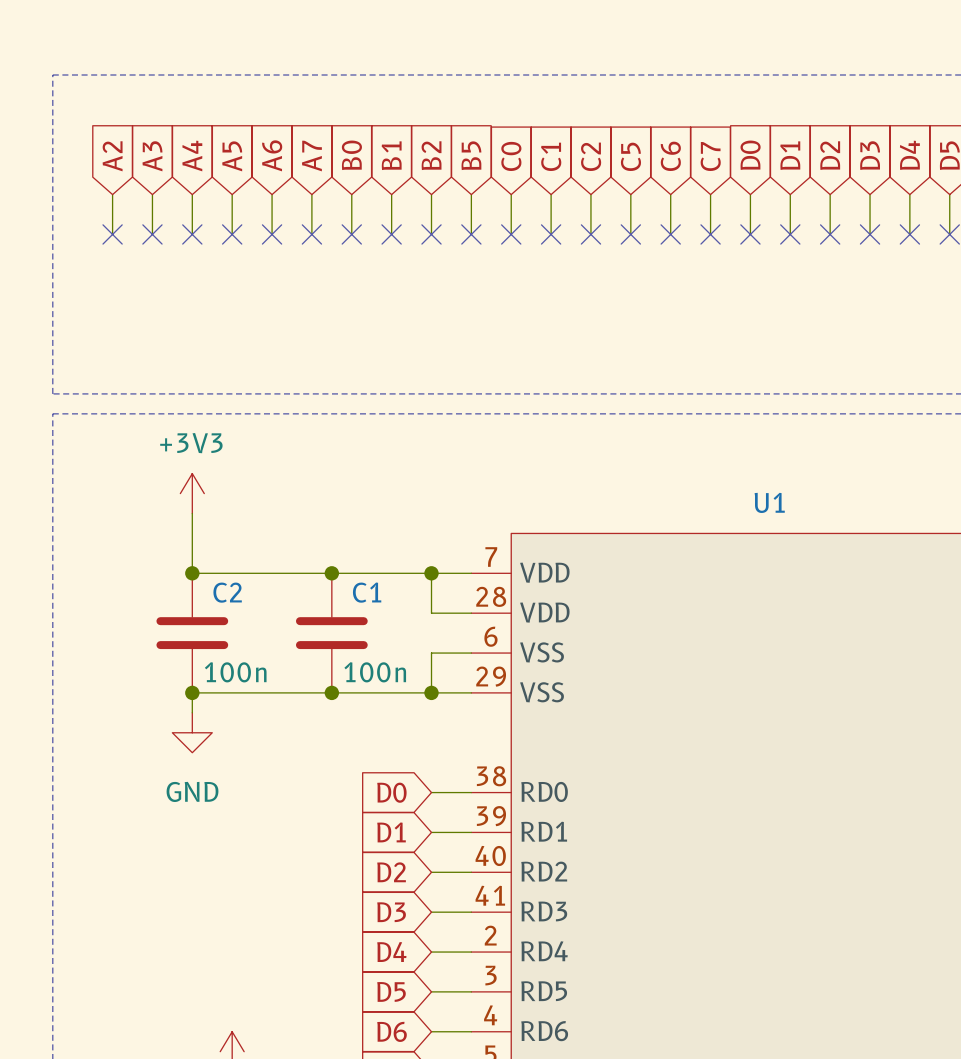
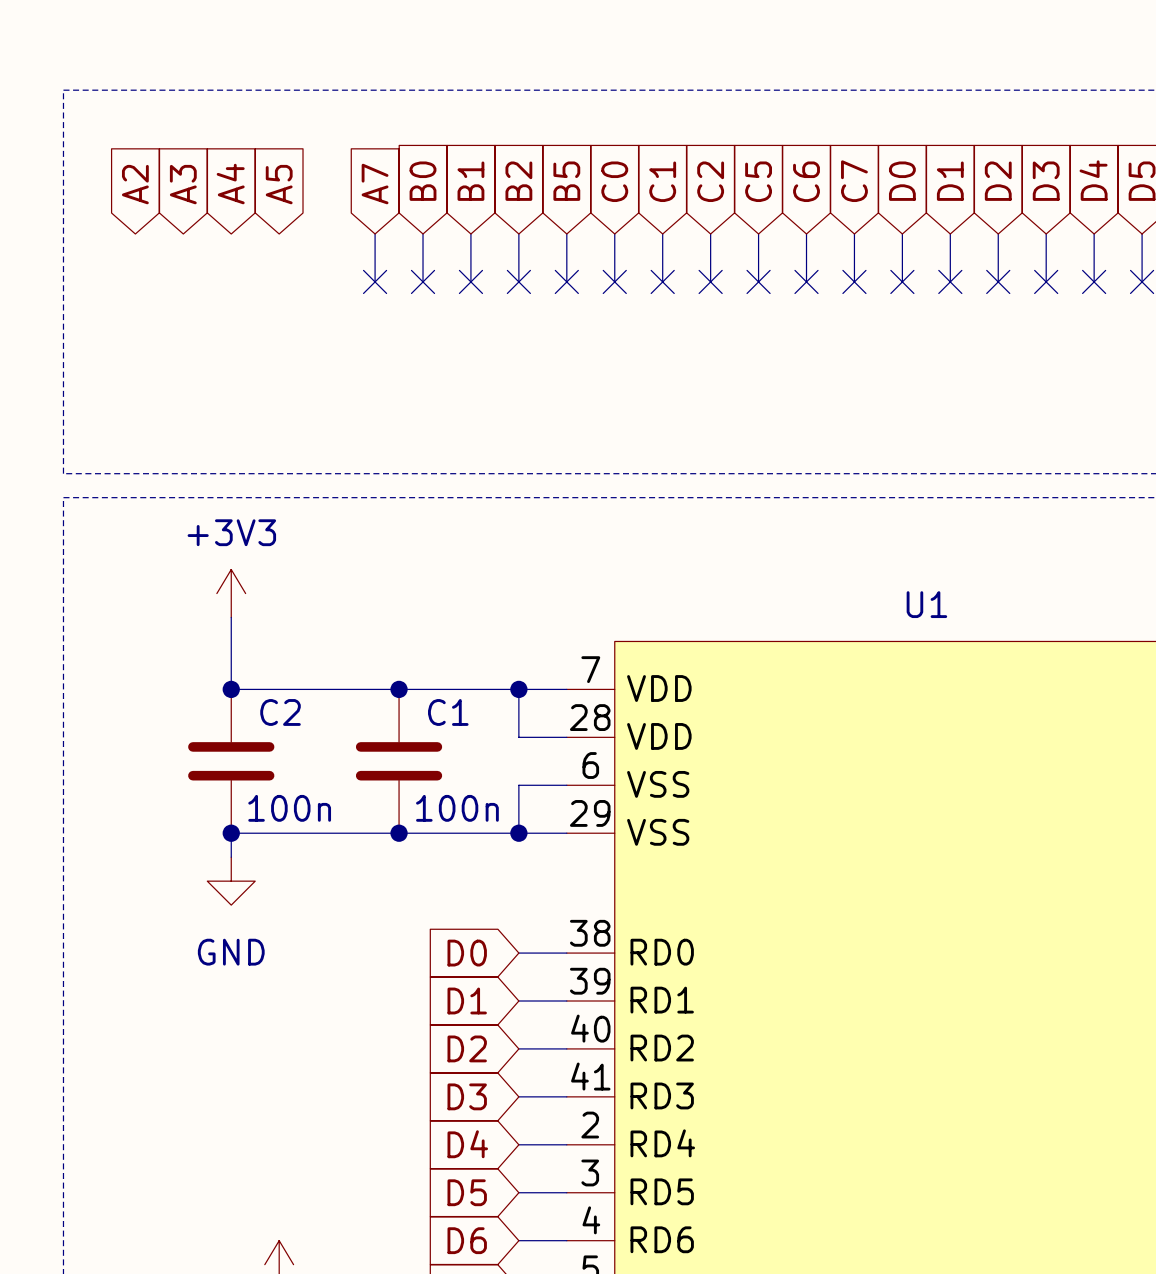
global label: A6 (272, 155) -> none
wire: (112, 194) (112, 234) -> none
wire: (152, 194) (152, 234) -> none
wire: (192, 194) (192, 234) -> none
wire: (232, 194) (232, 234) -> none
wire: (272, 194) (272, 234) -> none
no-connect mark: (112, 234) -> none
no-connect mark: (152, 234) -> none
no-connect mark: (192, 234) -> none
no-connect mark: (232, 234) -> none
no-connect mark: (272, 234) -> none

